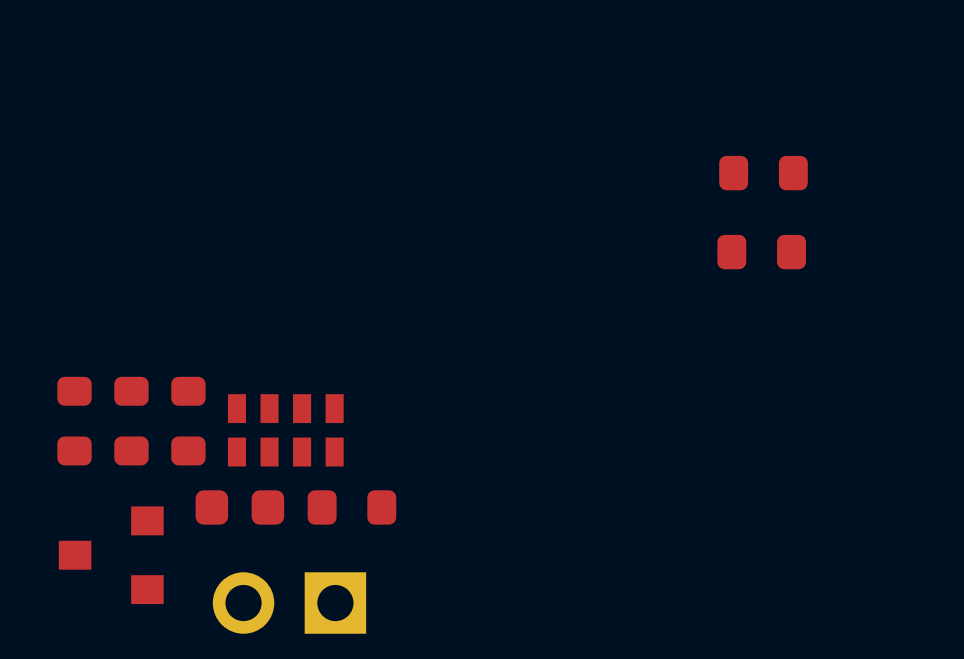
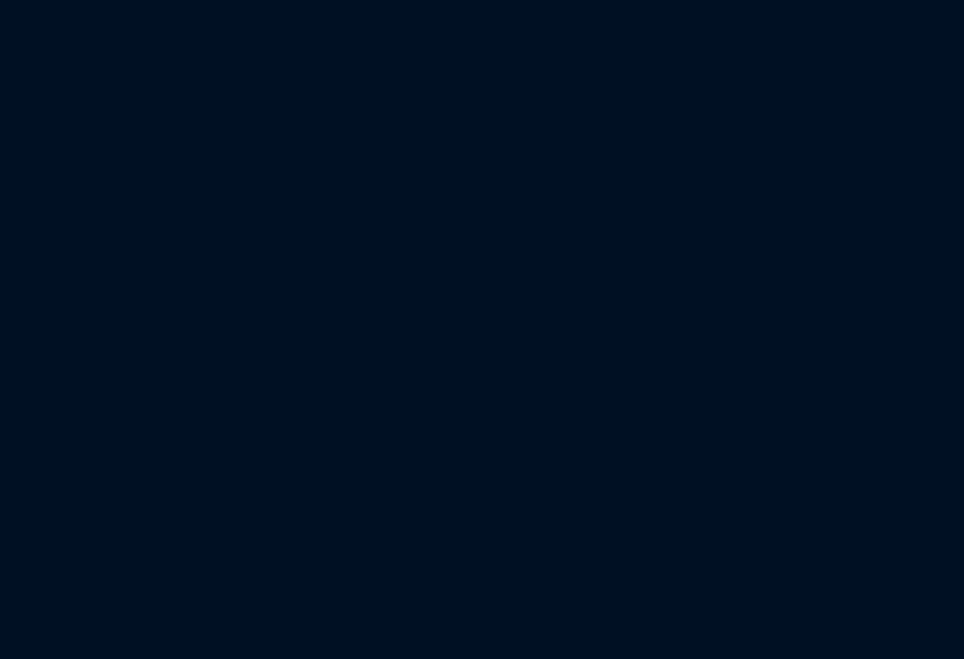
part: (763, 173) -> none
part: (761, 252) -> none
part: (74, 421) -> none
part: (131, 421) -> none
part: (188, 421) -> none
part: (285, 430) -> none
part: (239, 507) -> none
part: (351, 507) -> none
part: (111, 555) -> none
part: (289, 603) -> none

